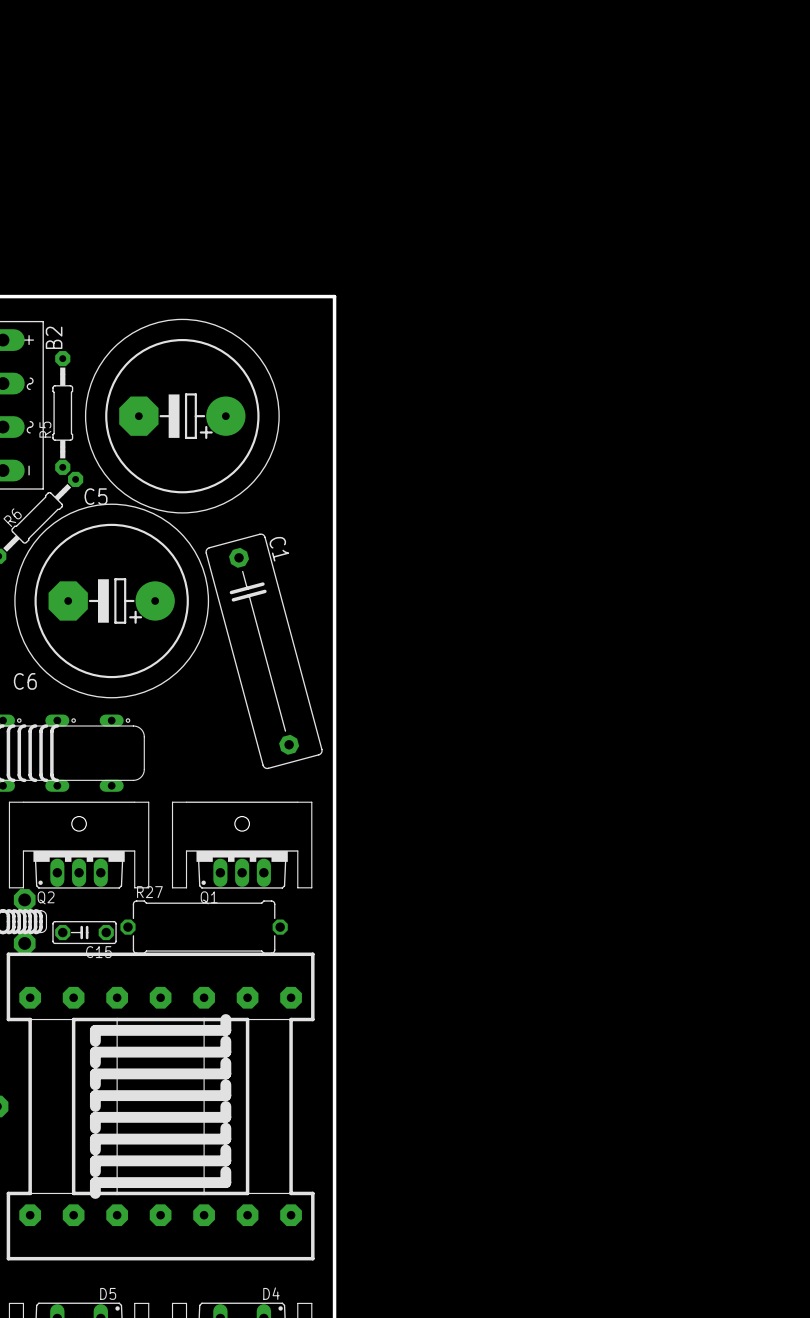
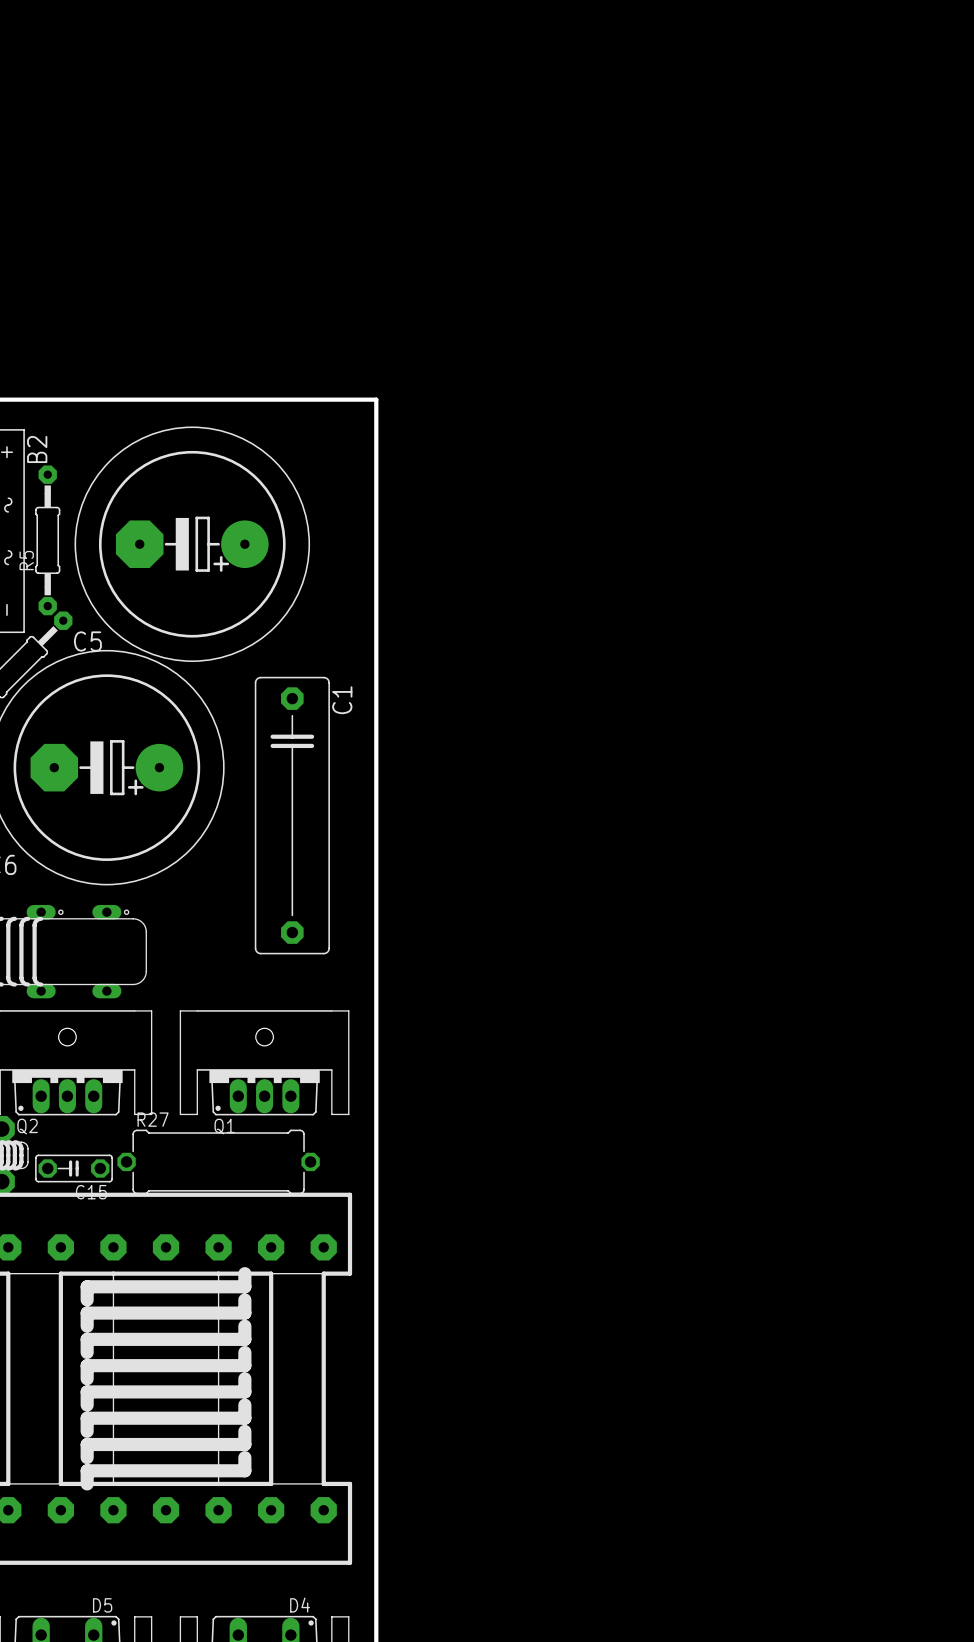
C1 rotation: 0° (264, 651) -> 15° clockwise (292, 815)

